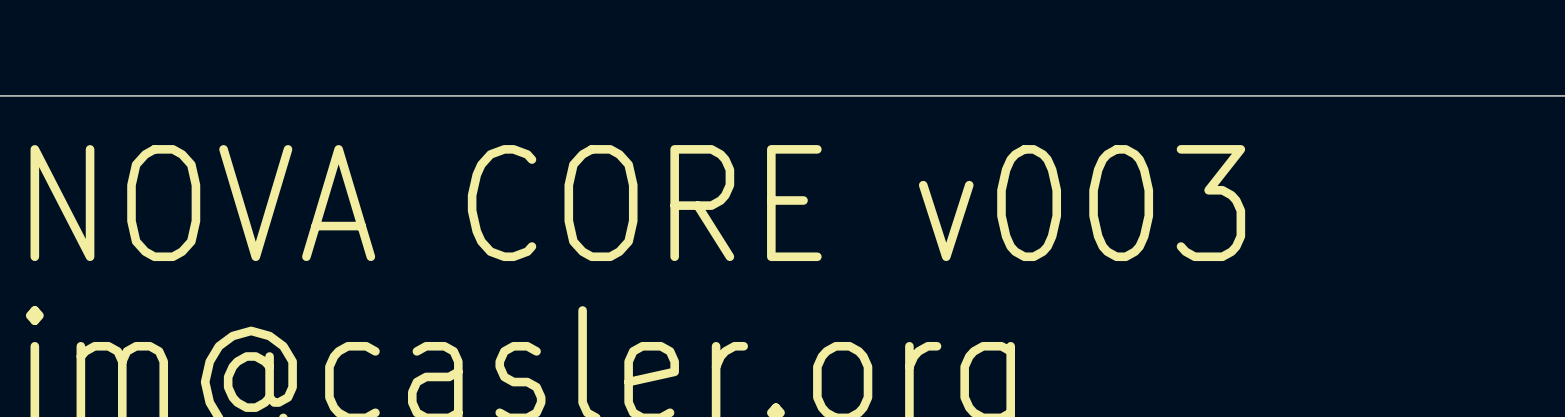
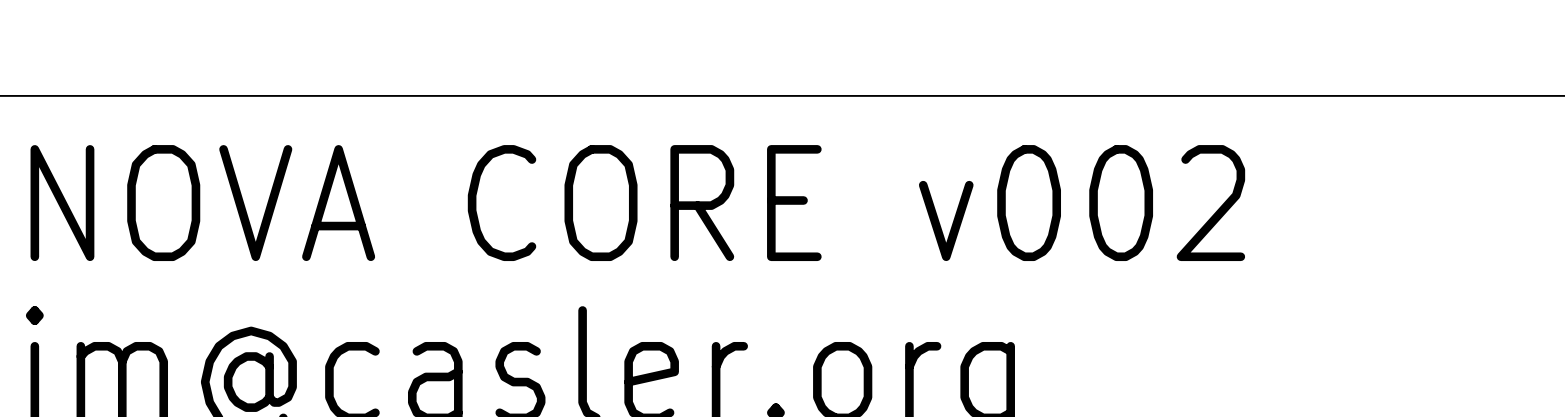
text: NOVA CORE v003 (637, 203) -> NOVA CORE v002 (637, 203)

